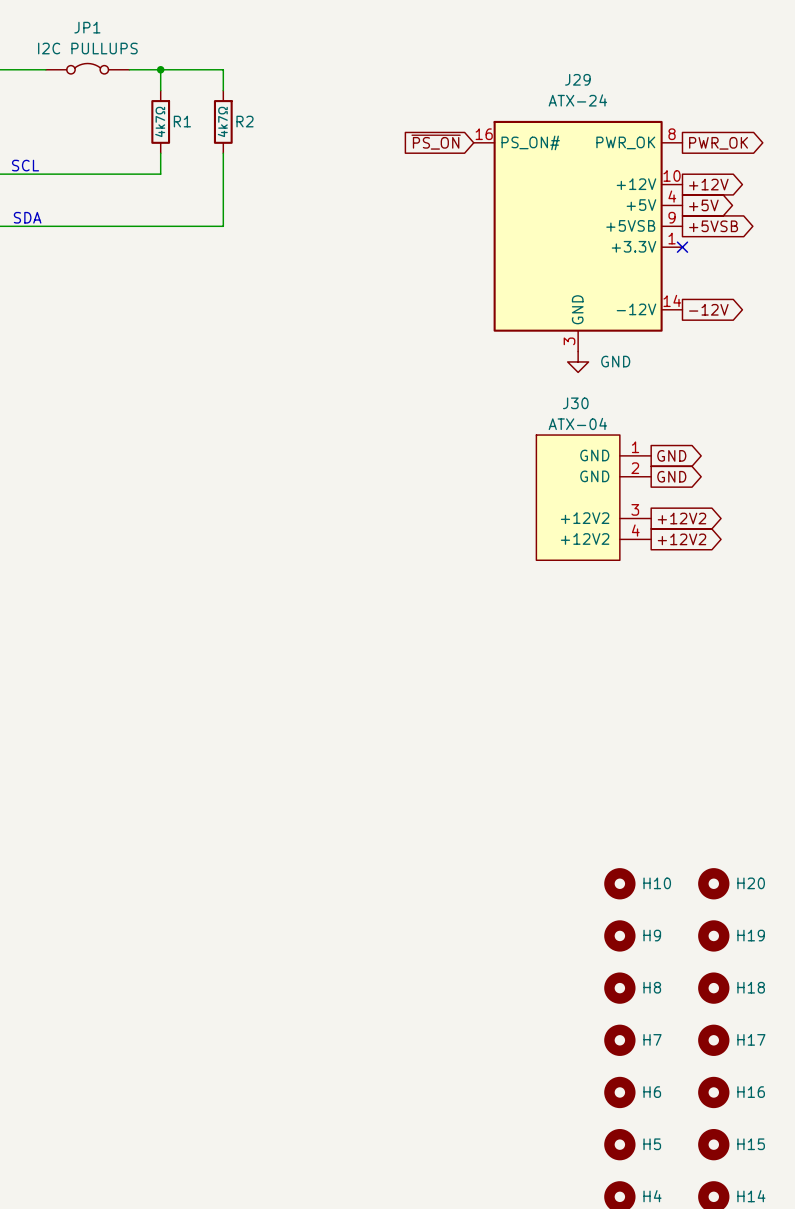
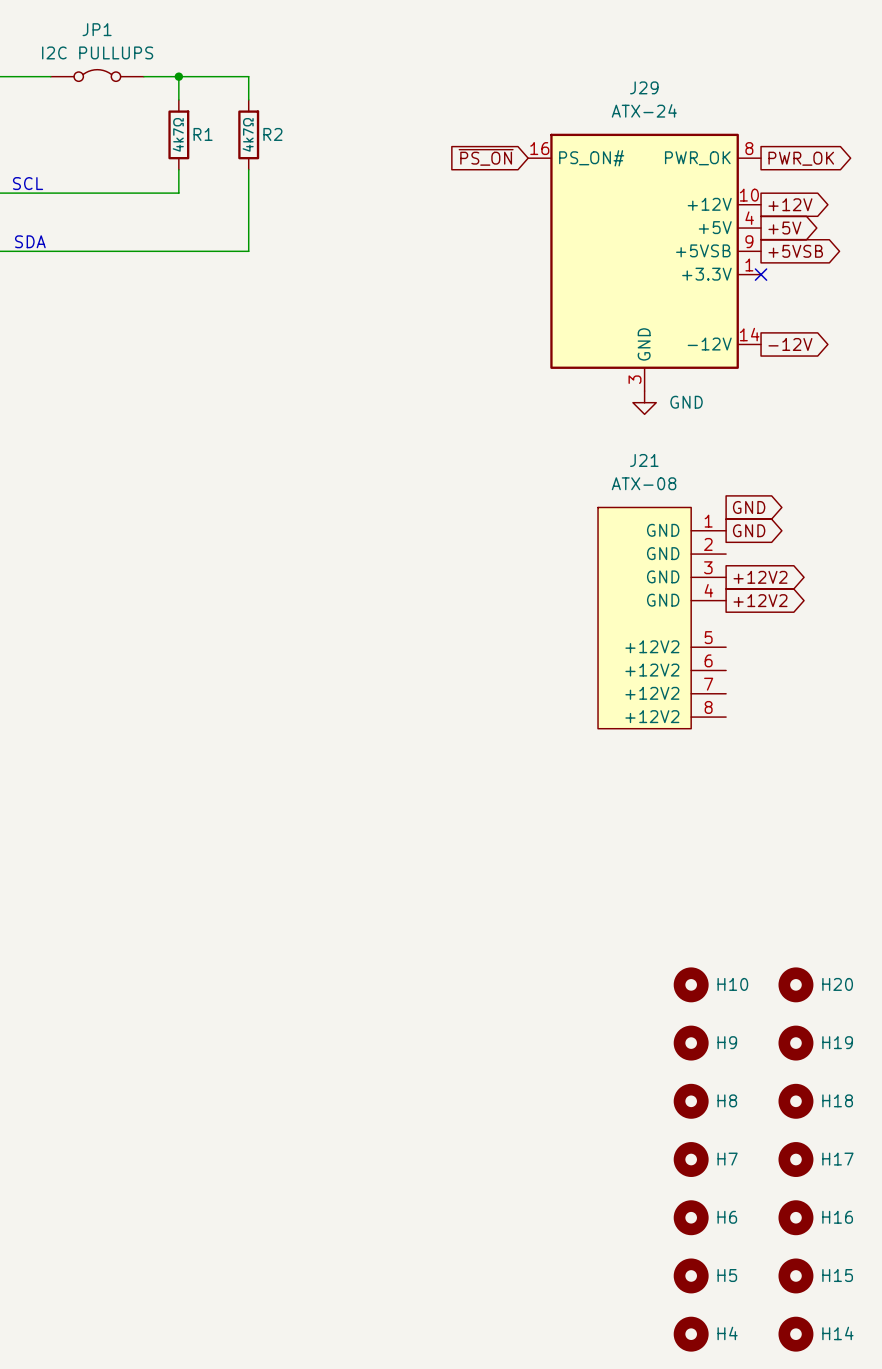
J30: ATX-04 (593, 497) -> none
J21: none -> ATX-08 (662, 618)

